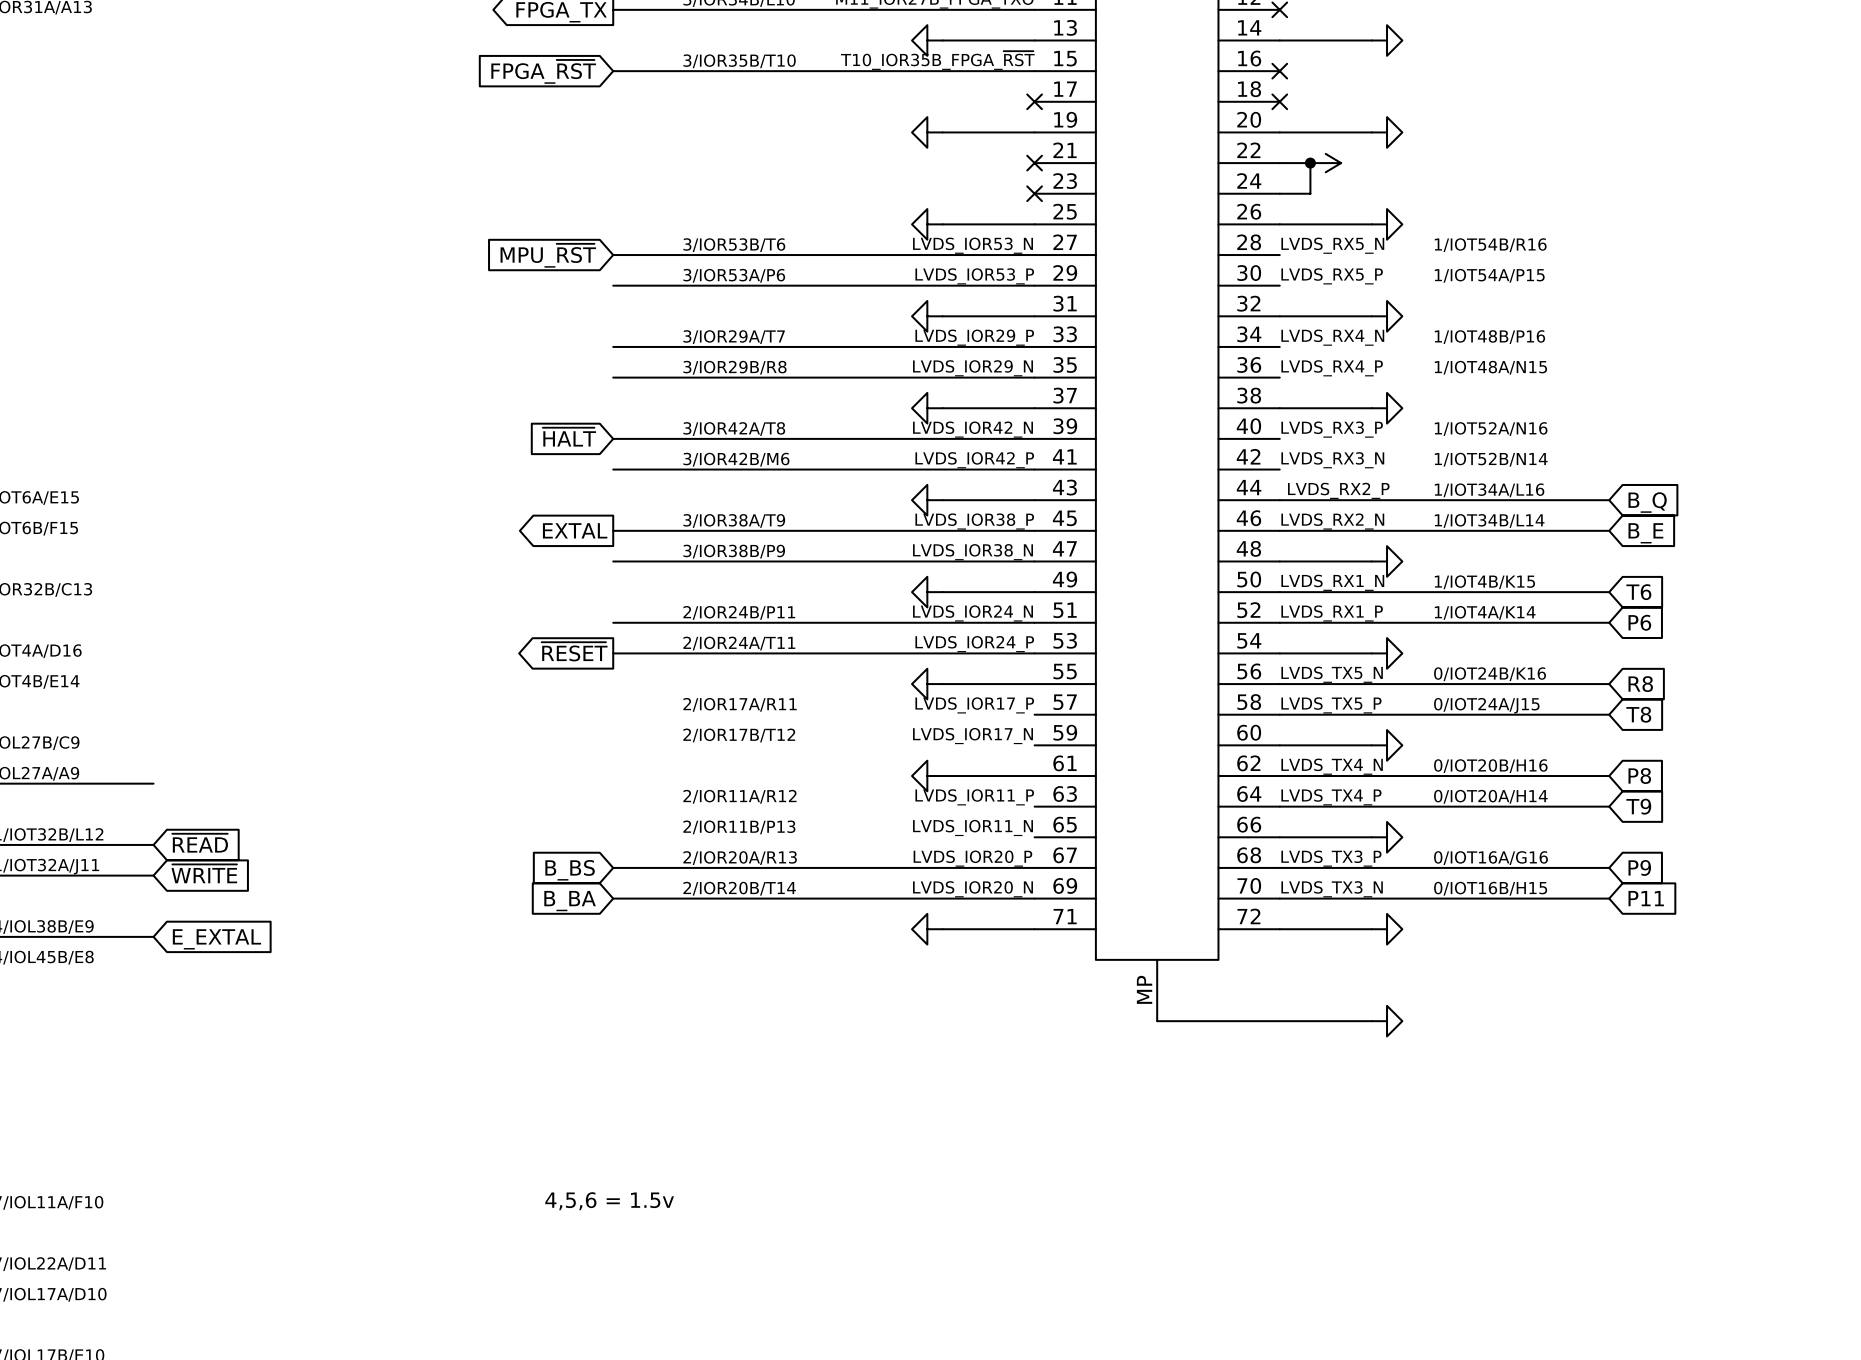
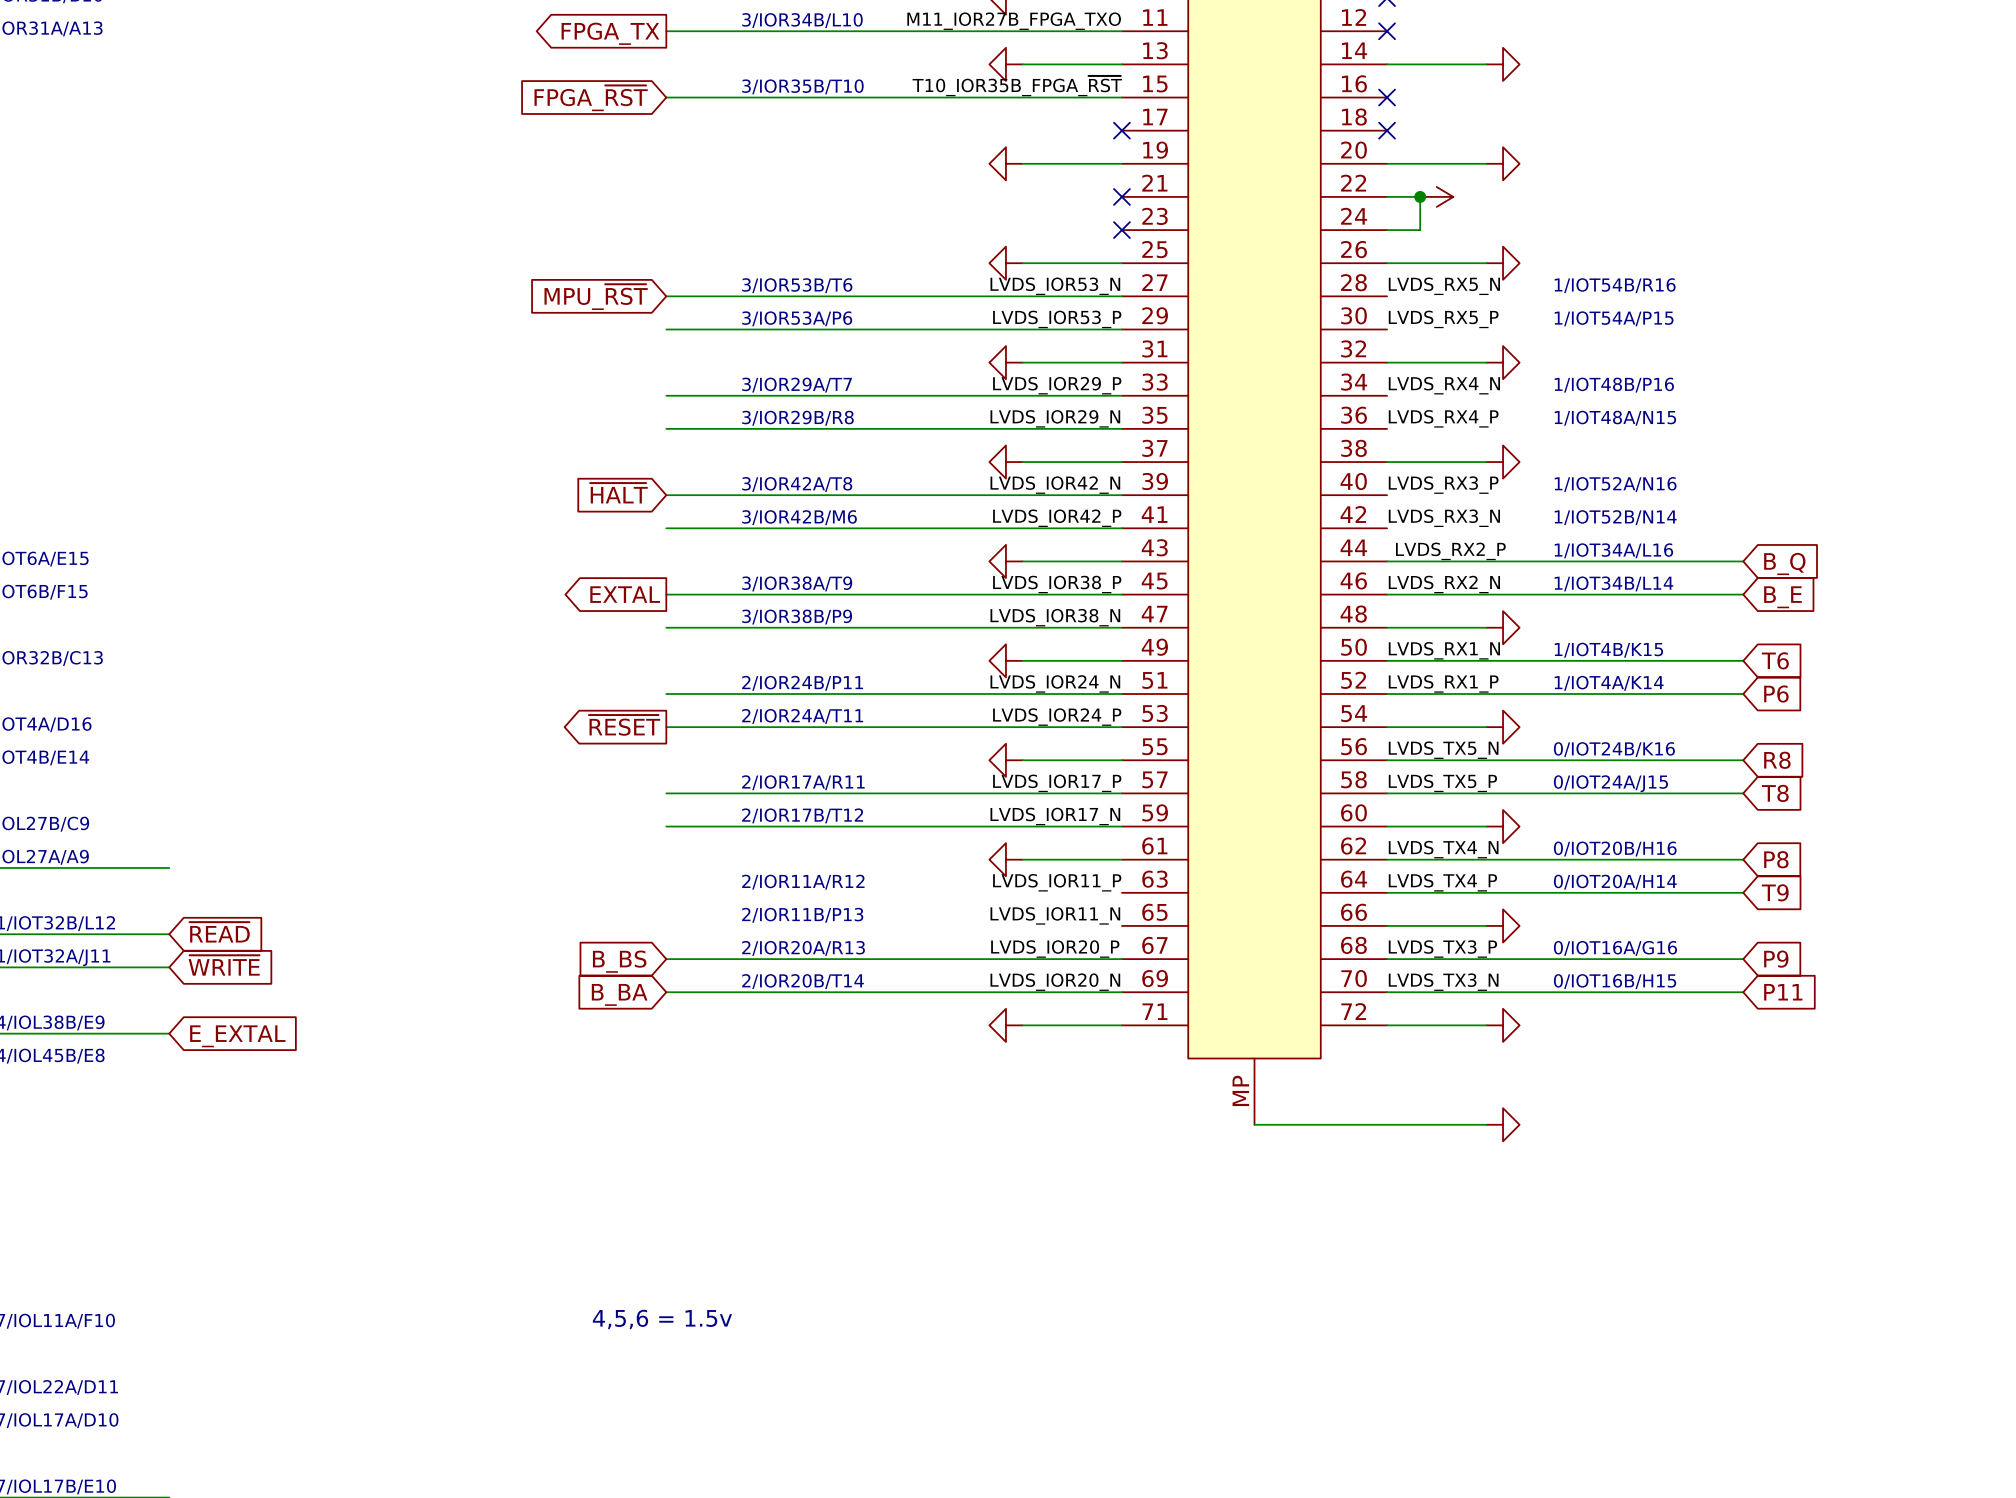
wire: none -> (666, 793) (1121, 793)
wire: none -> (666, 826) (1121, 826)

